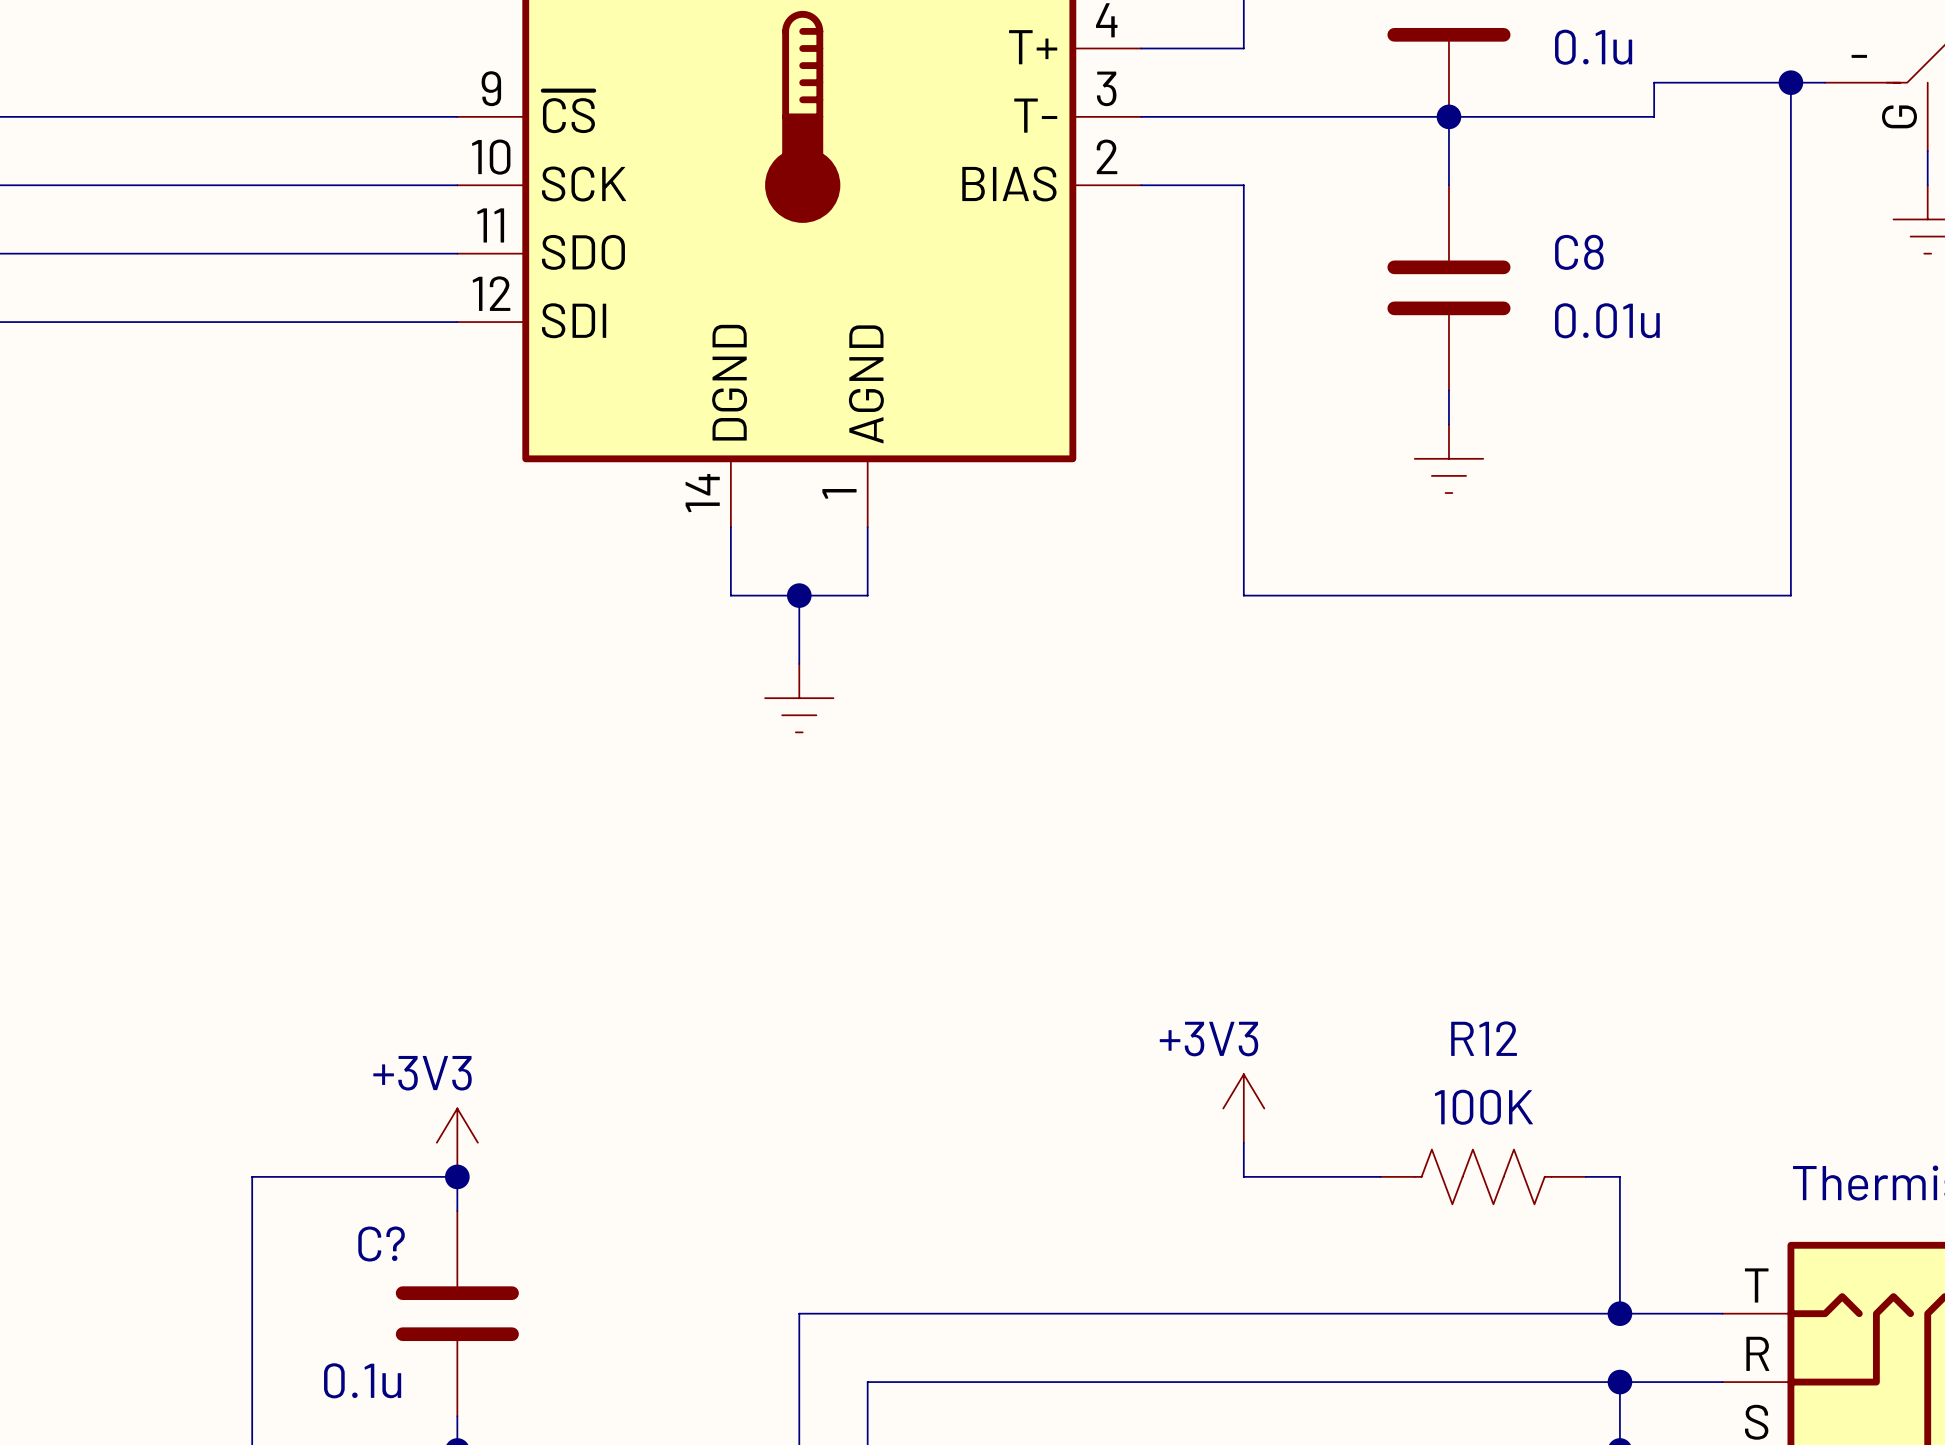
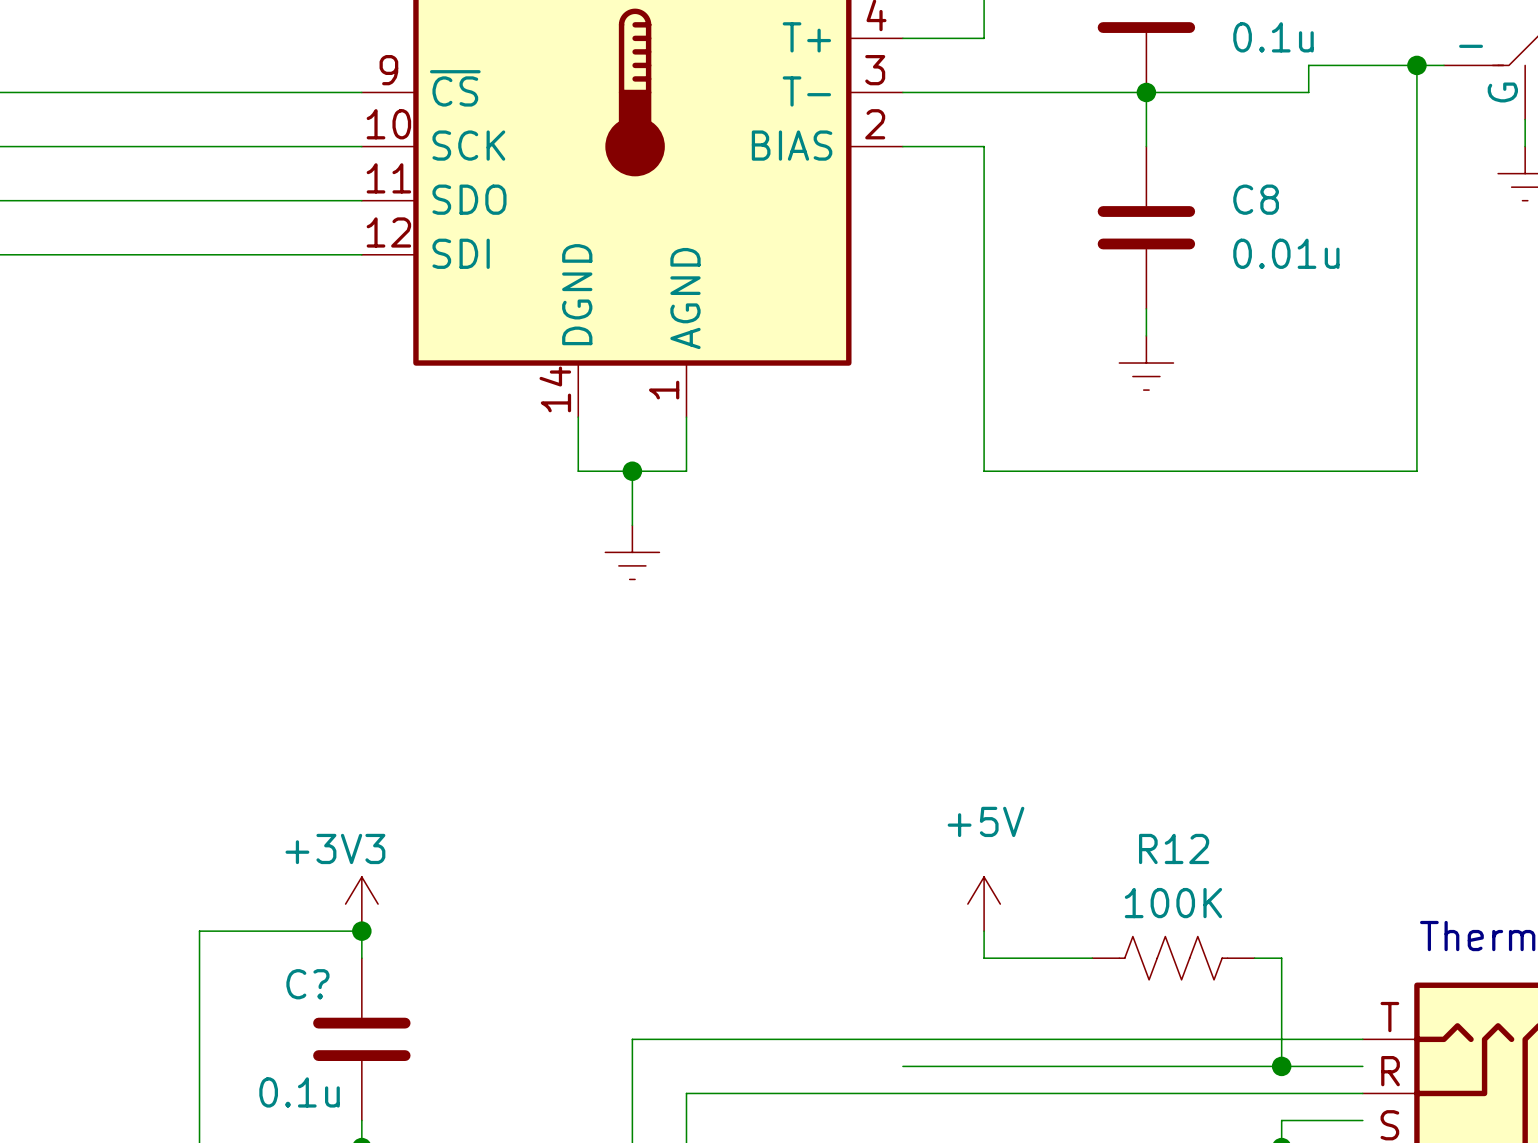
power symbol: +3V3 (1243, 1108) -> none
wire: (1243, 1142) (1243, 1176) (1380, 1176) -> (984, 931) (984, 958) (1092, 958)
power symbol: none -> +5V (984, 904)
R12 position: (1483, 1176) -> (1173, 958)
wire: (1585, 1176) (1619, 1176) (1619, 1211) -> (1254, 958) (1281, 958)
wire: none -> (1281, 1039) (1281, 1066)
junction: (1619, 1313) -> none
wire: none -> (902, 1066) (1362, 1066)
junction: none -> (1281, 1066)
wire: (1619, 1382) (1619, 1416) -> (1362, 1120) (1281, 1120)
junction: (1619, 1382) -> none

